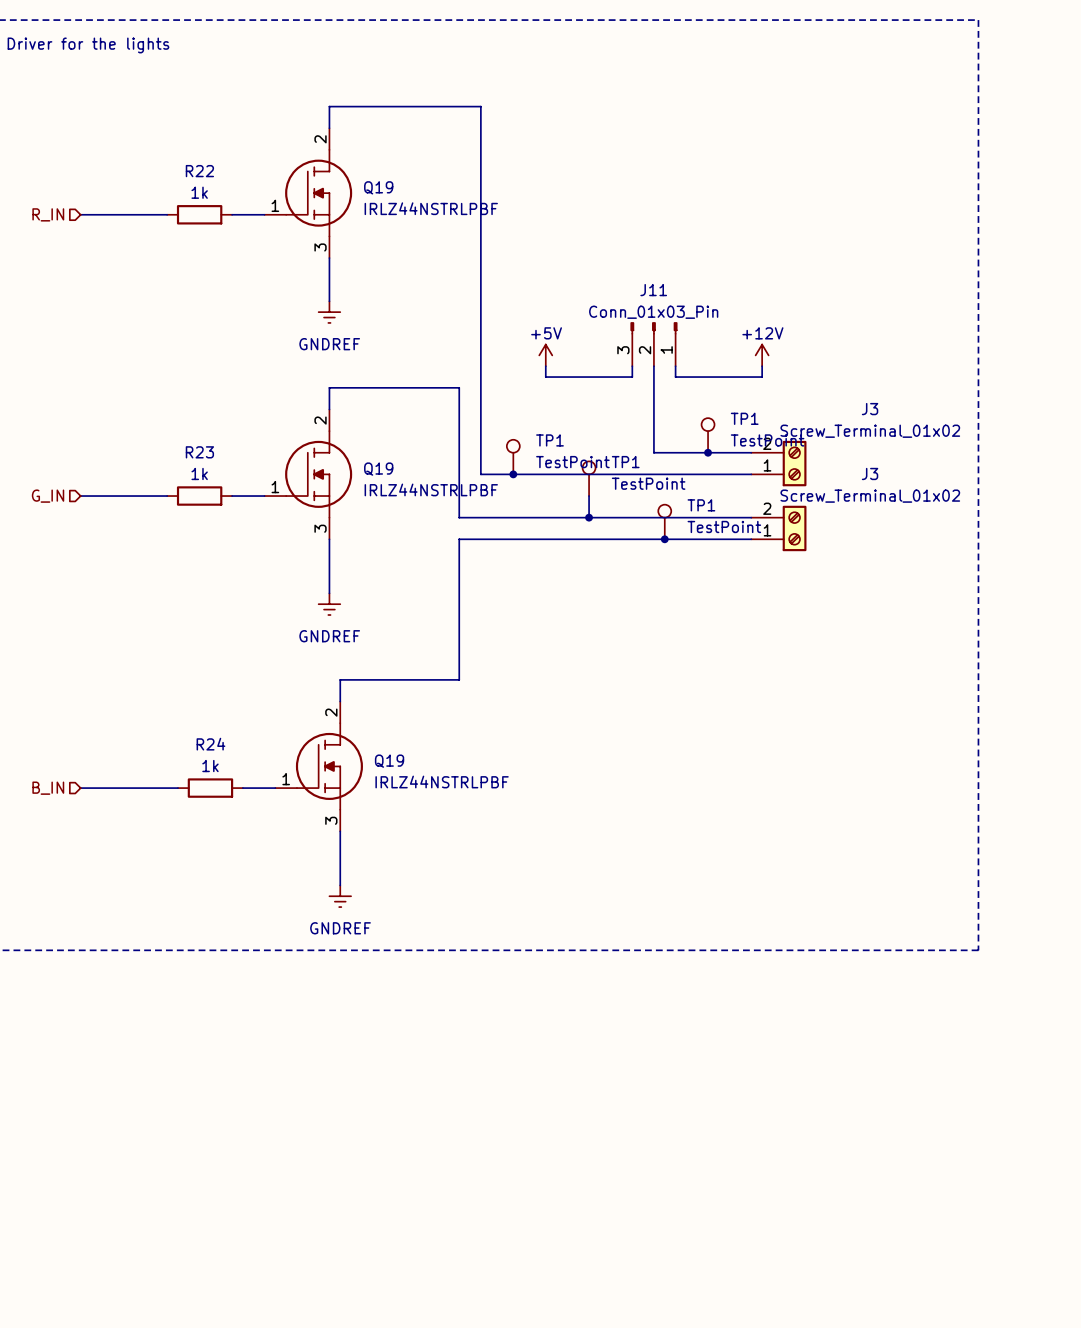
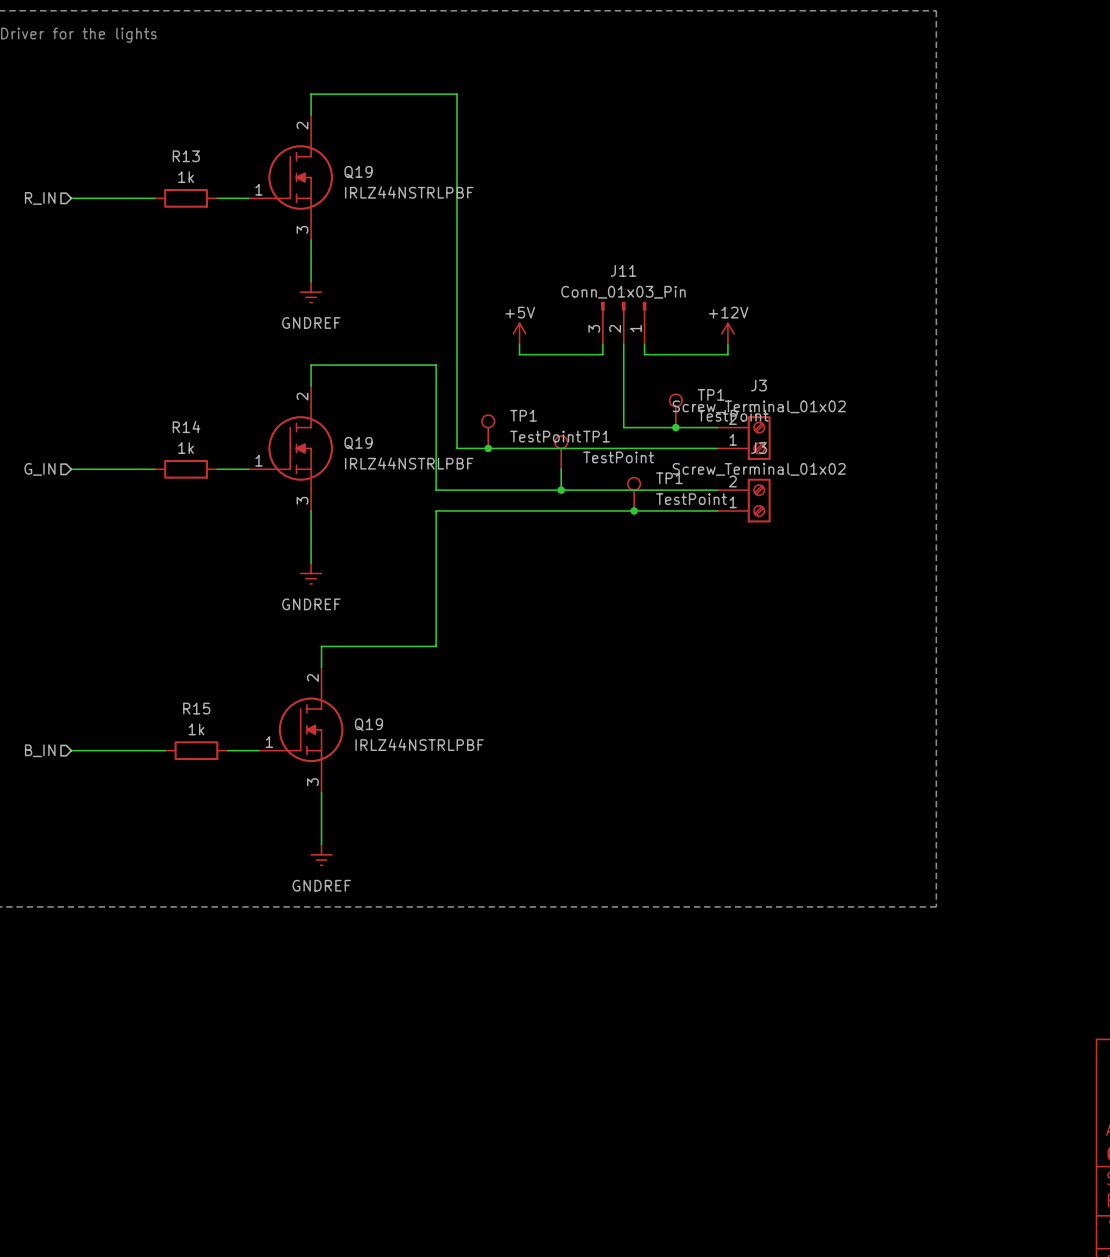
R22 name: R22 (199, 171) -> R13 (186, 156)
J3 name position: J3 (870, 409) -> J3 (758, 385)
J3 value position: Screw_Terminal_01x02 (870, 431) -> Screw_Terminal_01x02 (759, 406)
R23 name: R23 (199, 452) -> R14 (186, 426)
J3 name position: J3 (870, 473) -> J3 (758, 448)
J3 value position: Screw_Terminal_01x02 (870, 496) -> Screw_Terminal_01x02 (759, 469)
R24 name: R24 (210, 744) -> R15 (196, 708)

